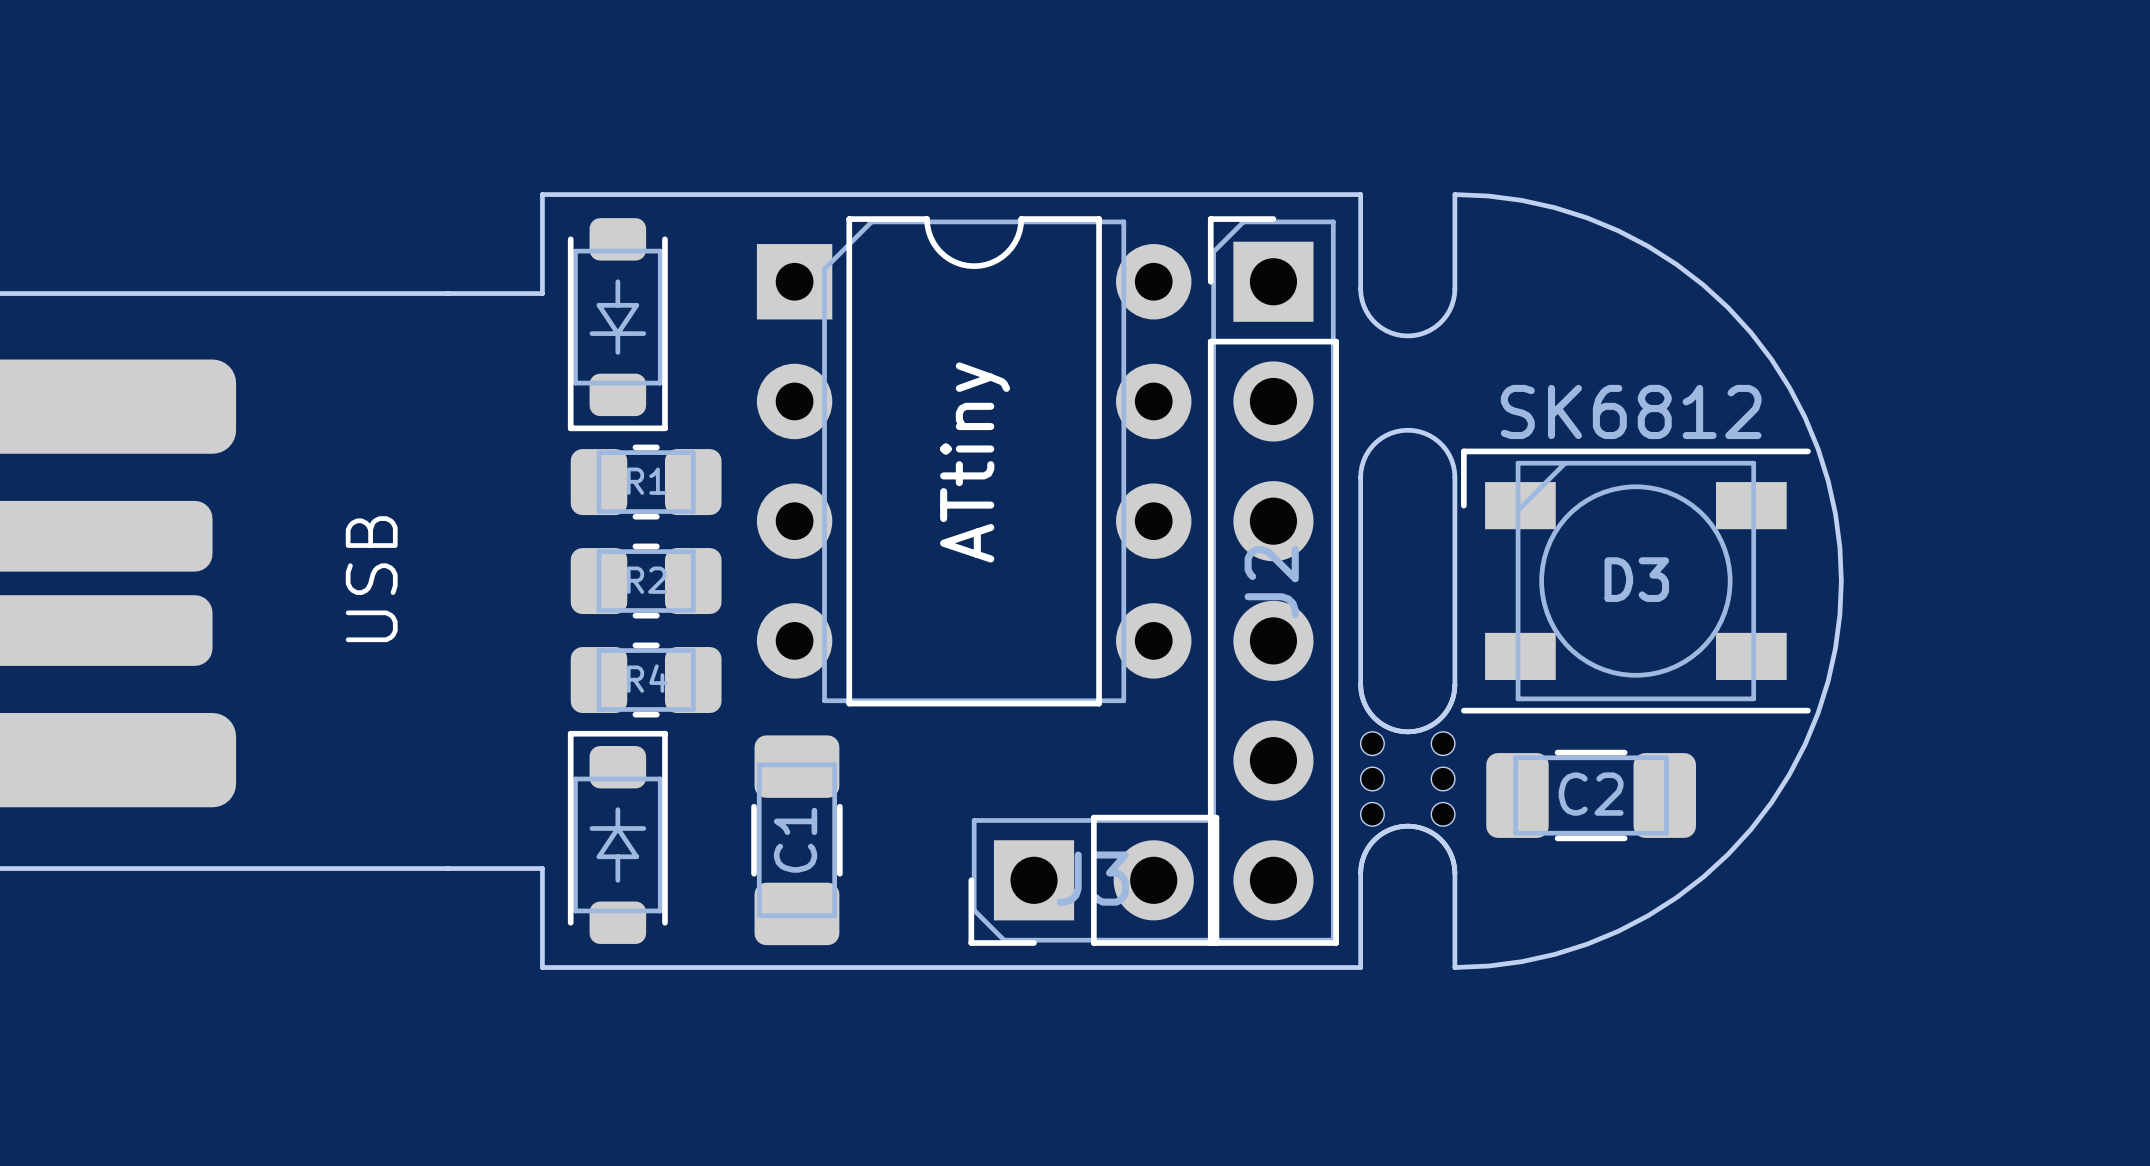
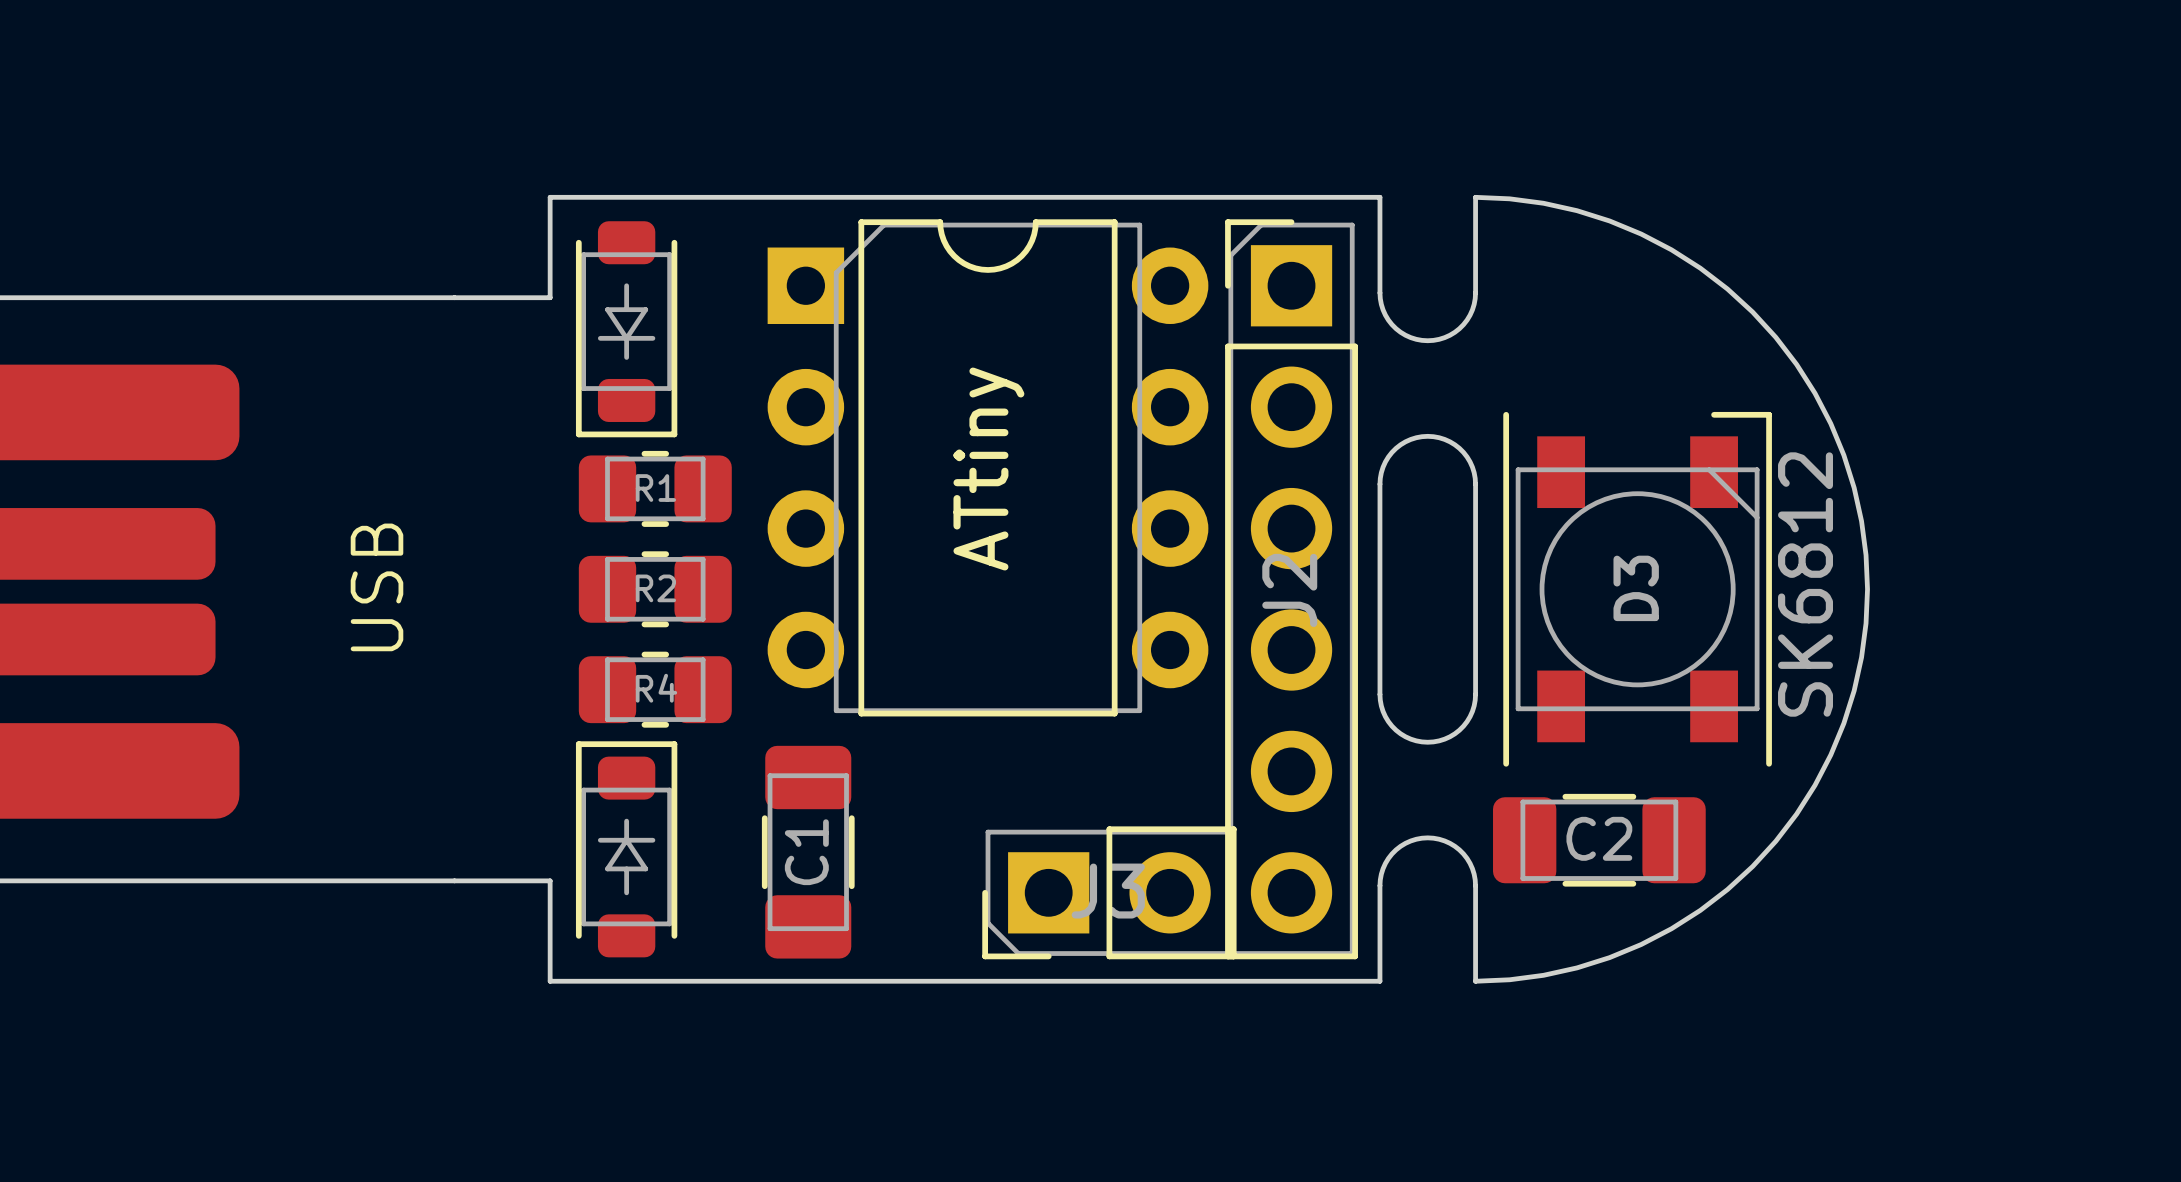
D3 rotation: 0° (1635, 581) -> 90° clockwise (1637, 589)
part: (1407, 778) -> none
C2 position: (1591, 795) -> (1599, 840)

